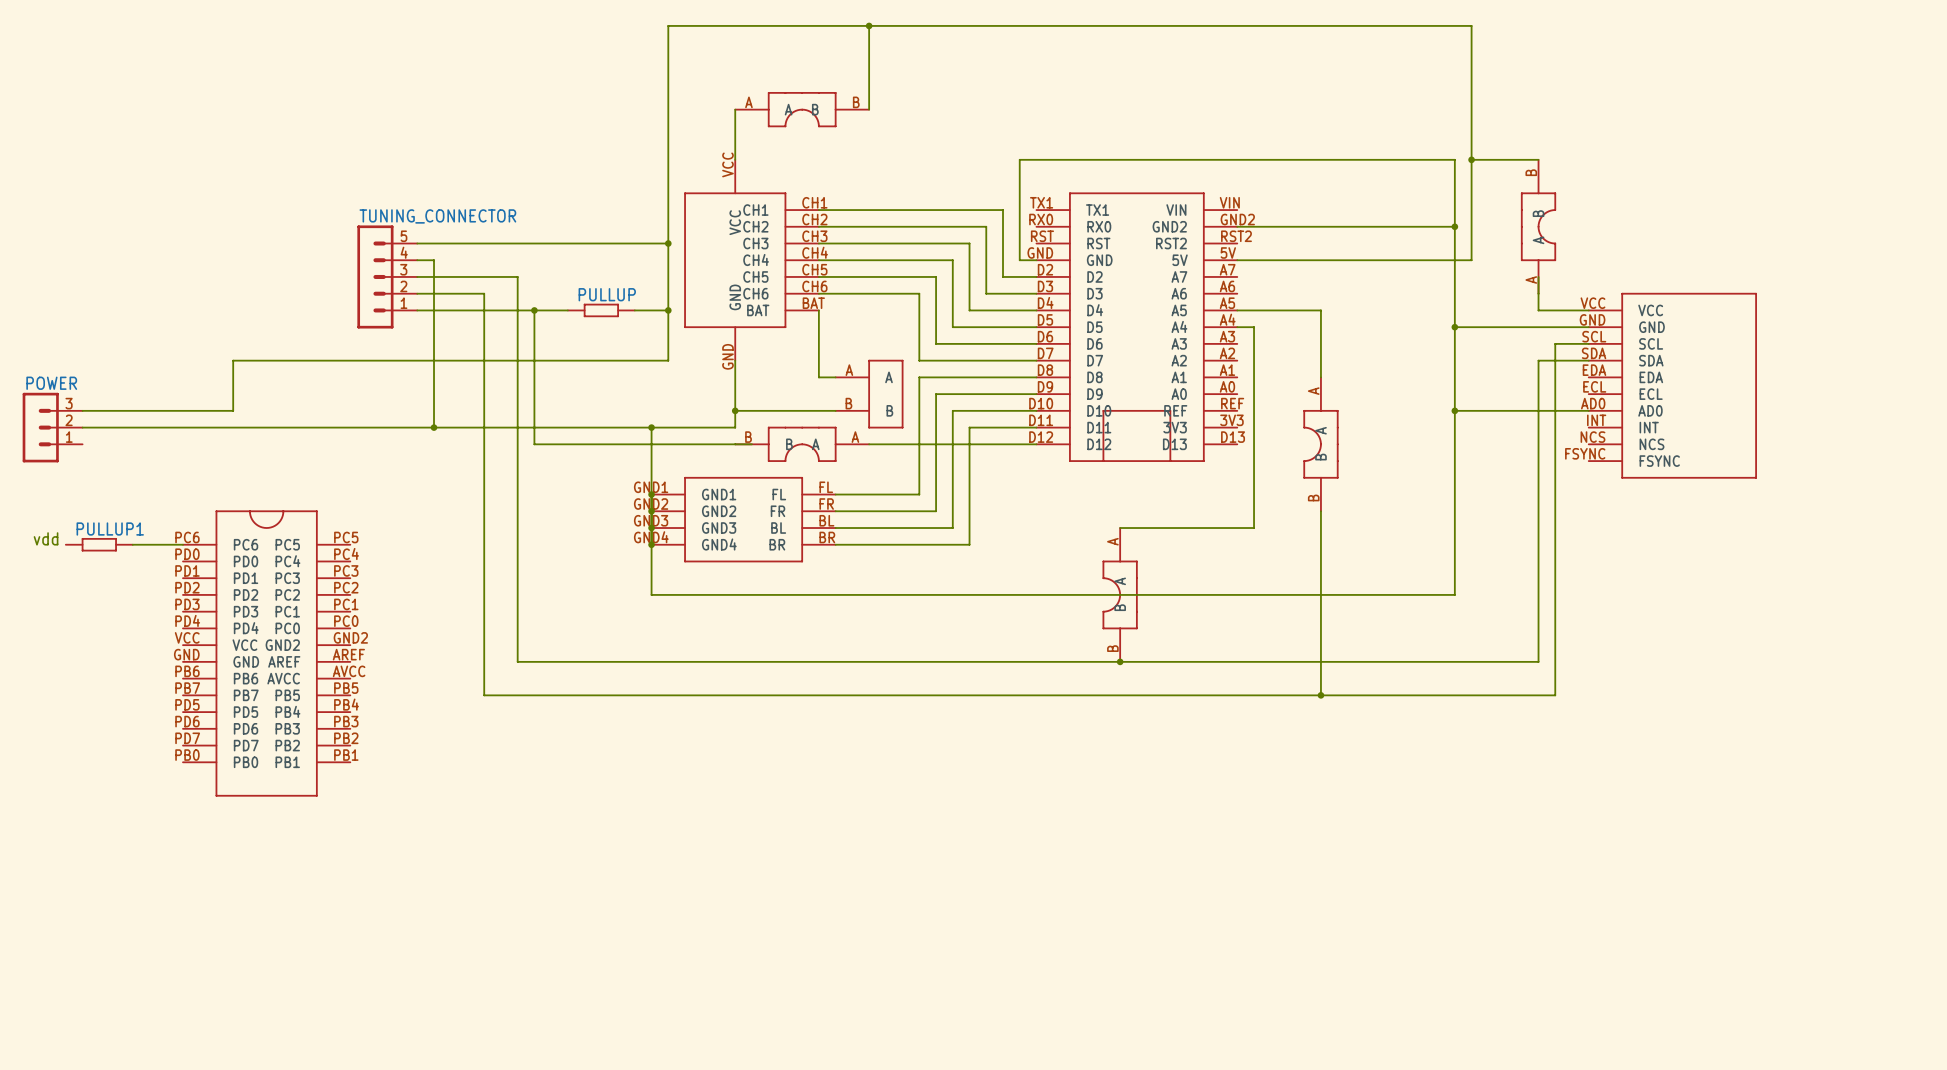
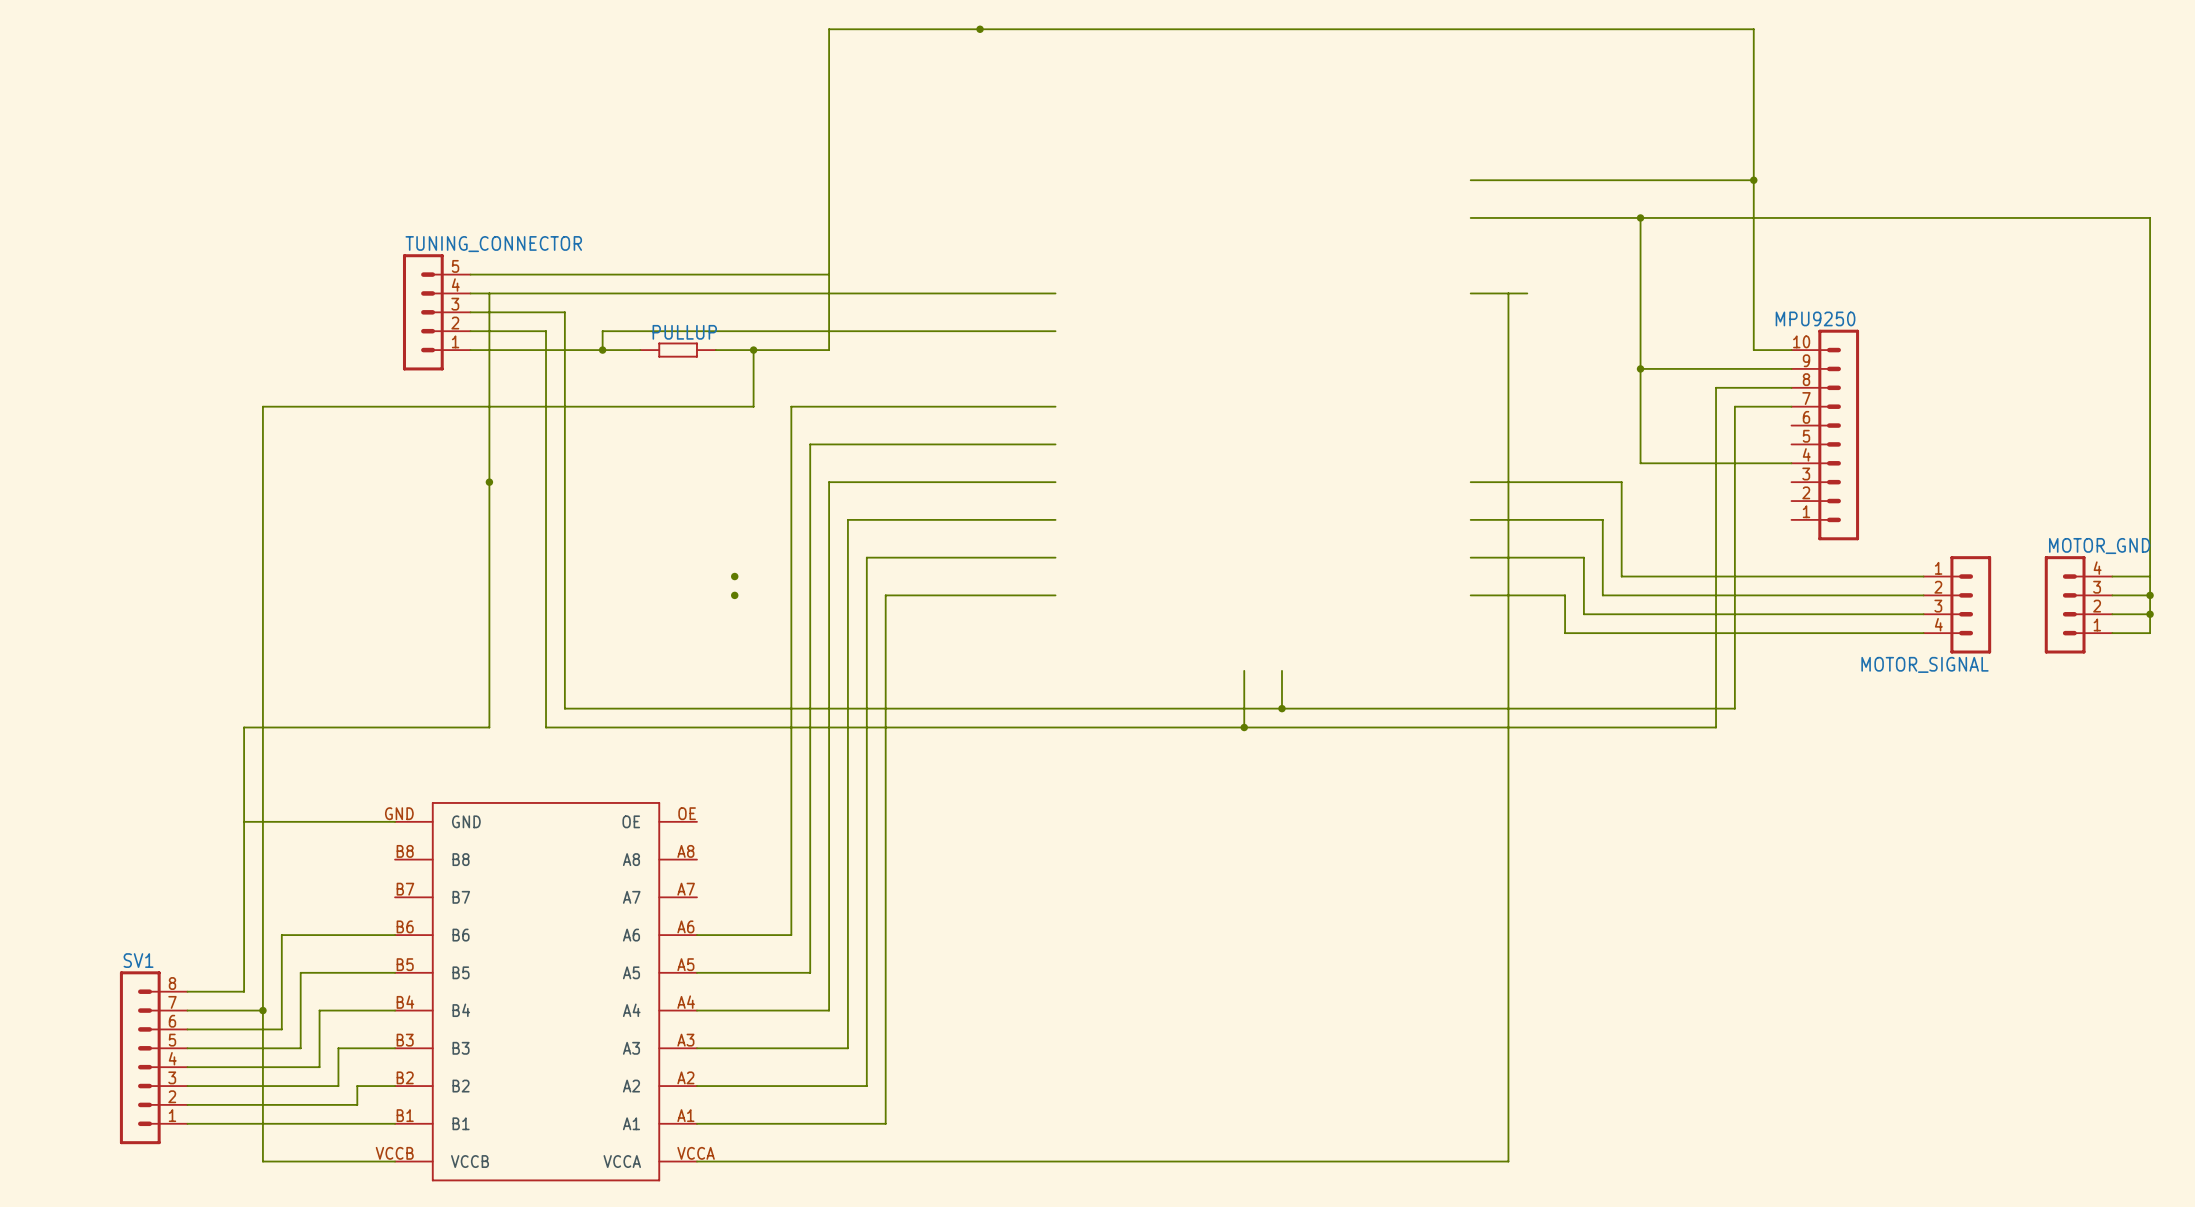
wire: (735, 25) (668, 25) (668, 310) -> (829, 180) (829, 350) (753, 350)
wire: (869, 25) (869, 109) -> (829, 29) (829, 123)
wire: (1471, 25) (1471, 260) (1354, 260) -> (1659, 29) (1753, 29) (1753, 350)
part: (802, 109) -> none
wire: (1304, 159) (1019, 159) (1019, 260) (1036, 260) -> none
wire: (1454, 159) (1454, 193) -> (1640, 180) (1659, 180)
junction: (1471, 159) -> none
wire: none -> (1734, 180) (1753, 180)
junction: none -> (1753, 180)
wire: none -> (1470, 217) (2150, 217) (2150, 633) (2112, 633)
junction: none -> (1640, 217)
wire: (818, 210) (1003, 210) (1003, 276) (1036, 276) -> none
wire: (818, 226) (986, 226) (986, 293) (1036, 293) -> none
wire: (1237, 226) (1454, 226) -> none
junction: (1454, 226) -> none
part: (1538, 226) -> none
wire: none -> (753, 274) (829, 274)
junction: (668, 243) -> none
wire: (818, 243) (969, 243) (969, 310) (1036, 310) -> none
wire: none -> (489, 293) (923, 293)
part: (751, 260) -> none
wire: (936, 260) (952, 260) (952, 327) (1036, 327) -> none
wire: (1237, 260) (1304, 260) -> none
wire: none -> (1508, 293) (1508, 1161) (696, 1161)
wire: (500, 276) (517, 276) (517, 661) (1538, 661) (1538, 628) -> (564, 312) (564, 708) (1734, 708)
wire: (818, 276) (936, 276) (936, 343) (1036, 343) -> none
wire: (1538, 276) (1538, 310) (1555, 310) -> none
wire: (919, 293) (919, 360) -> (1036, 331) (1055, 331)
wire: (534, 310) (534, 444) (751, 444) -> (602, 350) (602, 331) (923, 331)
wire: (818, 310) (818, 377) (835, 377) -> none
wire: (1237, 310) (1320, 310) (1320, 377) -> none
part: (1136, 327) -> none
wire: (1237, 327) (1254, 327) (1254, 528) (1120, 528) -> none
wire: (1555, 343) (1555, 695) (484, 695) (484, 645) -> (1753, 387) (1716, 387) (1716, 727) (546, 727)
wire: (735, 360) (735, 427) (82, 427) -> none
wire: none -> (1036, 406) (791, 406) (791, 935) (696, 935)
wire: (936, 360) (1036, 360) -> none
wire: (1036, 377) (919, 377) (919, 494) -> (1055, 557) (1036, 557)
MPU9250: none -> (1825, 434)
part: (1672, 385) -> none
part: (869, 394) -> none
wire: none -> (1055, 444) (810, 444) (810, 972) (696, 972)
wire: (1036, 394) (936, 394) (936, 511) (835, 511) -> none
wire: (82, 410) (233, 410) -> (395, 1161) (262, 1161) (262, 463)
wire: (735, 410) (835, 410) -> none
junction: (735, 410) -> none
wire: (1036, 410) (952, 410) (952, 528) (936, 528) -> none
wire: (1454, 410) (1454, 594) (651, 594) (651, 427) -> none
junction: (1454, 410) -> none
POWER: (52, 427) -> none
wire: none -> (489, 482) (489, 727) (244, 727) (244, 991) (187, 991)
junction: (651, 427) -> none
wire: none -> (1055, 482) (829, 482) (829, 1010) (696, 1010)
wire: (1036, 427) (969, 427) (969, 544) (835, 544) -> none
wire: none -> (1470, 482) (1621, 482) (1621, 576) (1923, 576)
part: (802, 444) -> none
wire: (869, 444) (1036, 444) -> none
part: (1320, 444) -> none
wire: none -> (1055, 519) (847, 519) (847, 1048) (696, 1048)
wire: none -> (1470, 519) (1602, 519) (1602, 595) (1923, 595)
junction: (651, 494) -> none
wire: none -> (942, 557) (866, 557) (866, 1086) (696, 1086)
wire: none -> (1470, 557) (1583, 557) (1583, 614) (1923, 614)
wire: (1320, 511) (1320, 695) -> none
wire: none -> (2112, 576) (2150, 576)
part: (743, 519) -> none
wire: none -> (942, 595) (885, 595) (885, 1123) (696, 1123)
wire: none -> (1470, 595) (1565, 595) (1565, 633) (1923, 633)
wire: none -> (2112, 595) (2150, 595)
junction: none -> (2150, 595)
MOTOR_SIGNAL: none -> (1957, 604)
MOTOR_GND: none -> (2078, 604)
text: vdd (46, 538) -> none
PULLUP1: (99, 544) -> none
wire: (132, 544) (182, 544) -> none
junction: (651, 544) -> none
wire: none -> (2112, 614) (2150, 614)
junction: none -> (2150, 614)
wire: none -> (1244, 670) (1244, 727)
part: (1120, 594) -> none
junction: none -> (1281, 708)
junction: none -> (1244, 727)
part: (266, 653) -> none
junction: (1120, 661) -> none
junction: (1320, 695) -> none
wire: none -> (244, 821) (395, 821)
wire: none -> (395, 935) (281, 935) (281, 1029) (187, 1029)
wire: none -> (395, 972) (300, 972) (300, 1048) (187, 1048)
part: none -> (546, 991)
wire: none -> (187, 1010) (262, 1010)
junction: none -> (262, 1010)
wire: none -> (395, 1010) (319, 1010) (319, 1067) (187, 1067)
wire: none -> (395, 1048) (338, 1048) (338, 1086) (187, 1086)
SV1: none -> (153, 1057)
wire: none -> (395, 1086) (357, 1086) (357, 1104) (187, 1104)
wire: none -> (187, 1123) (395, 1123)

